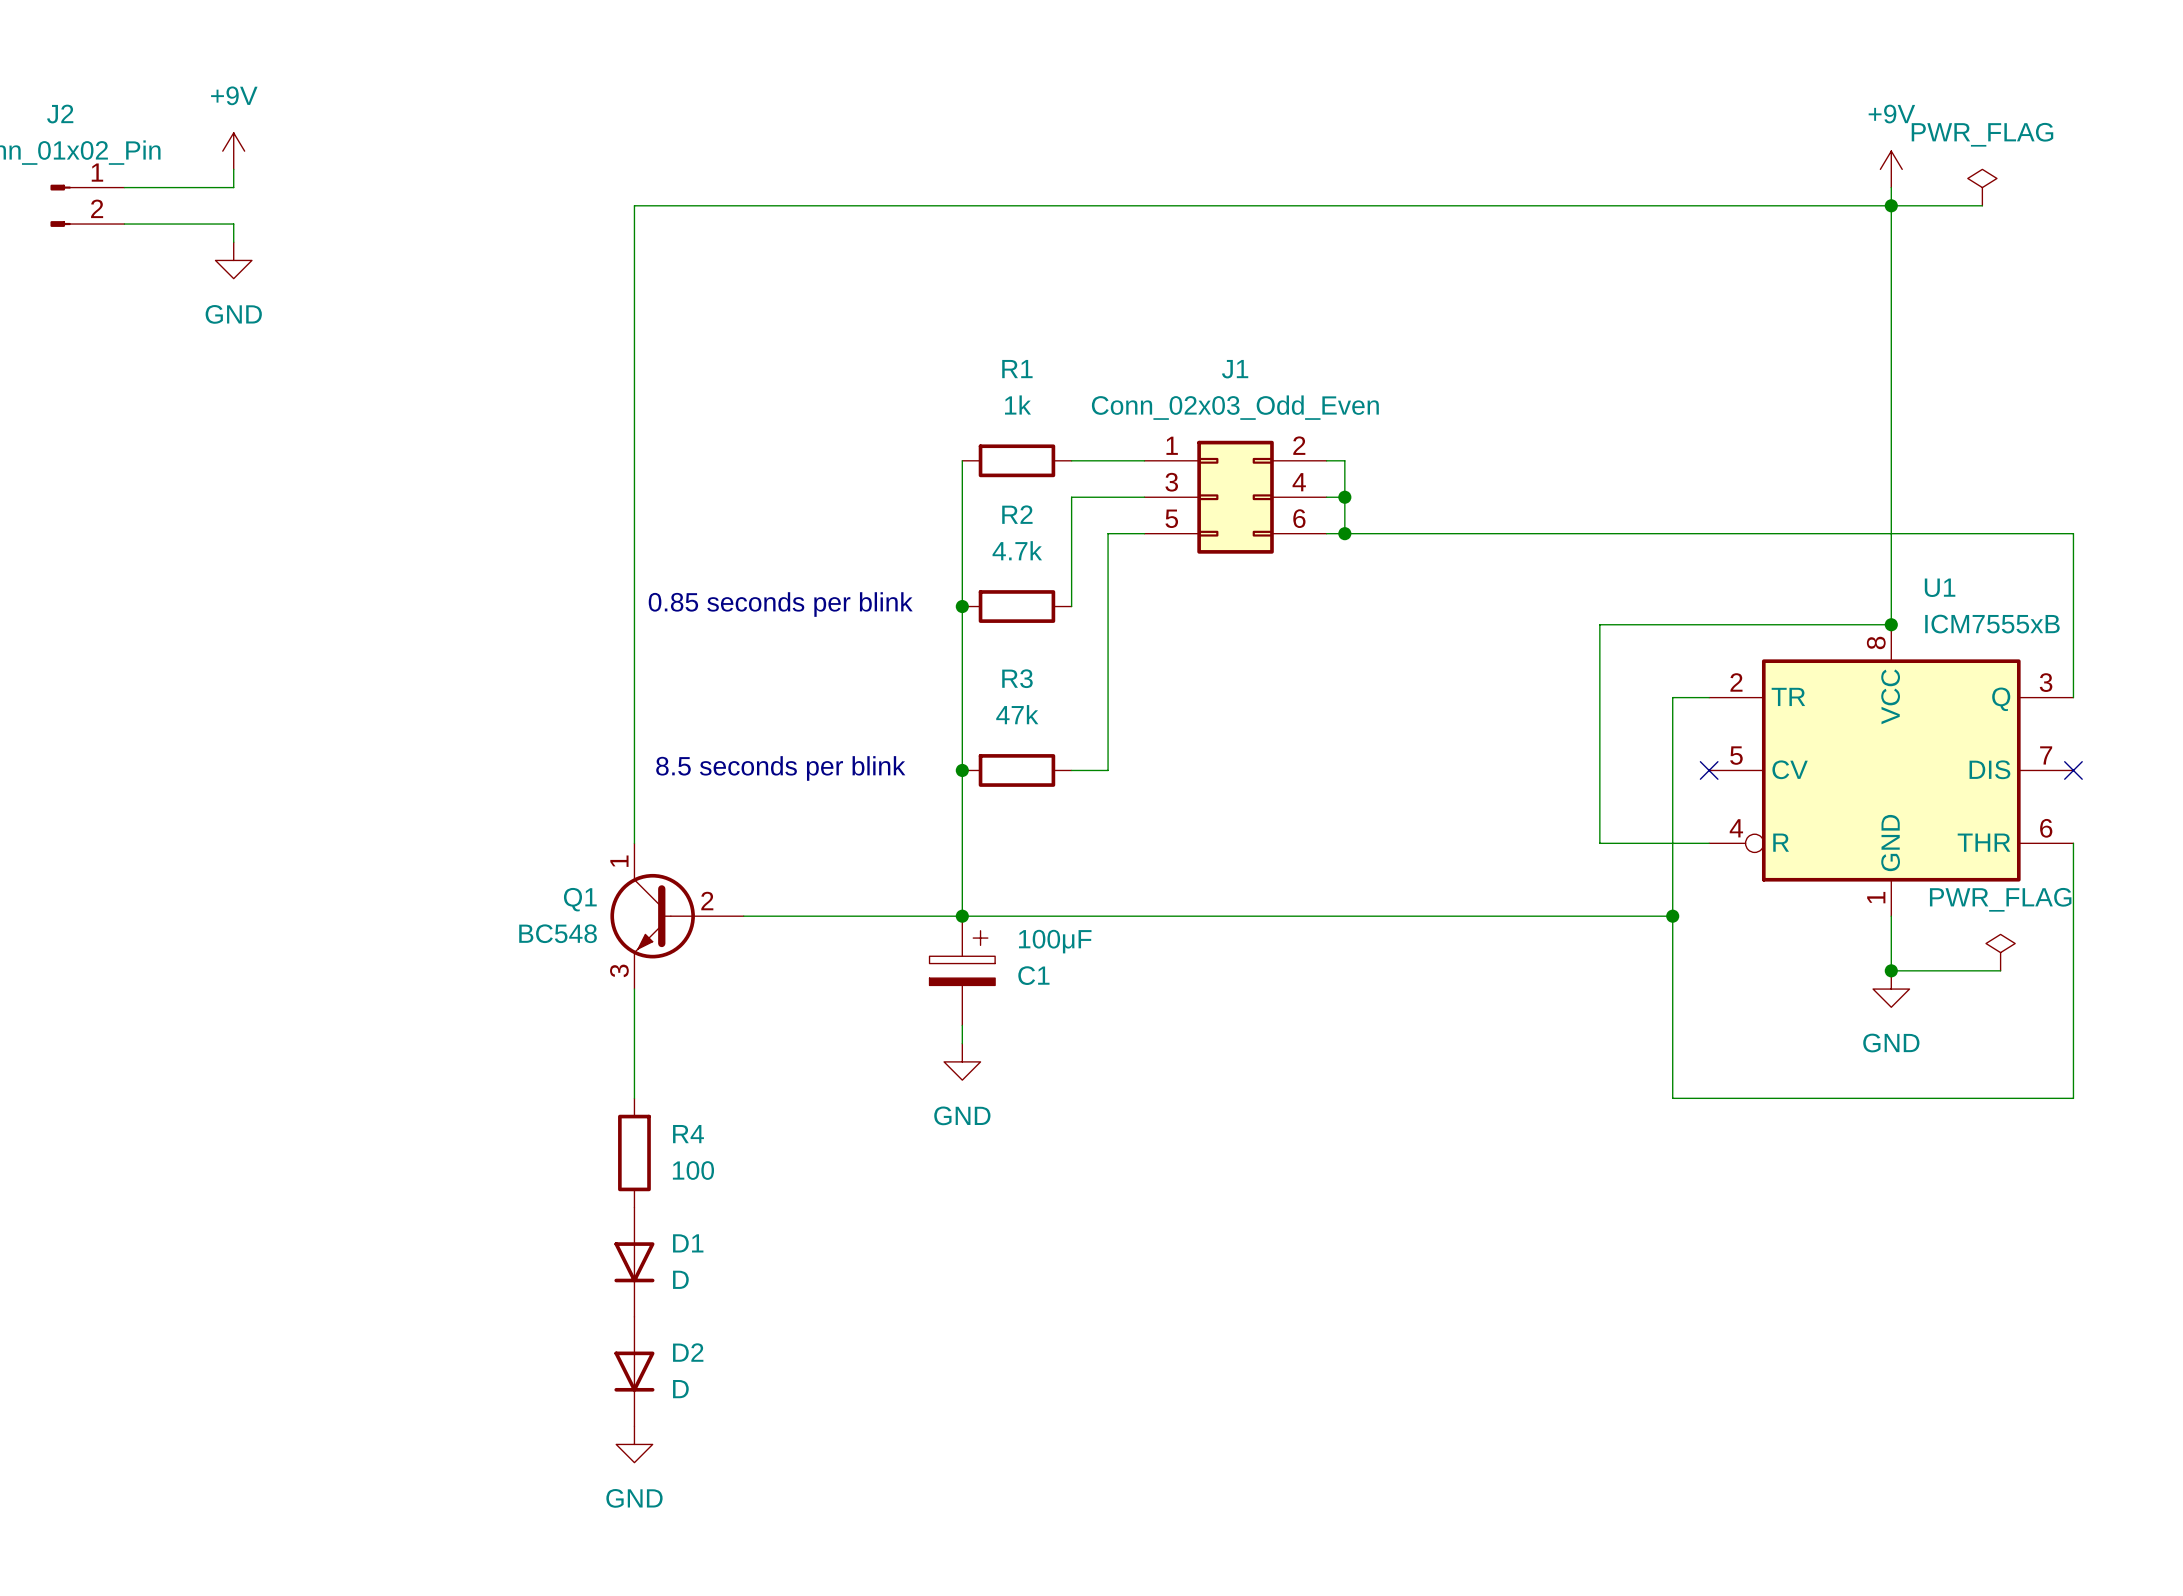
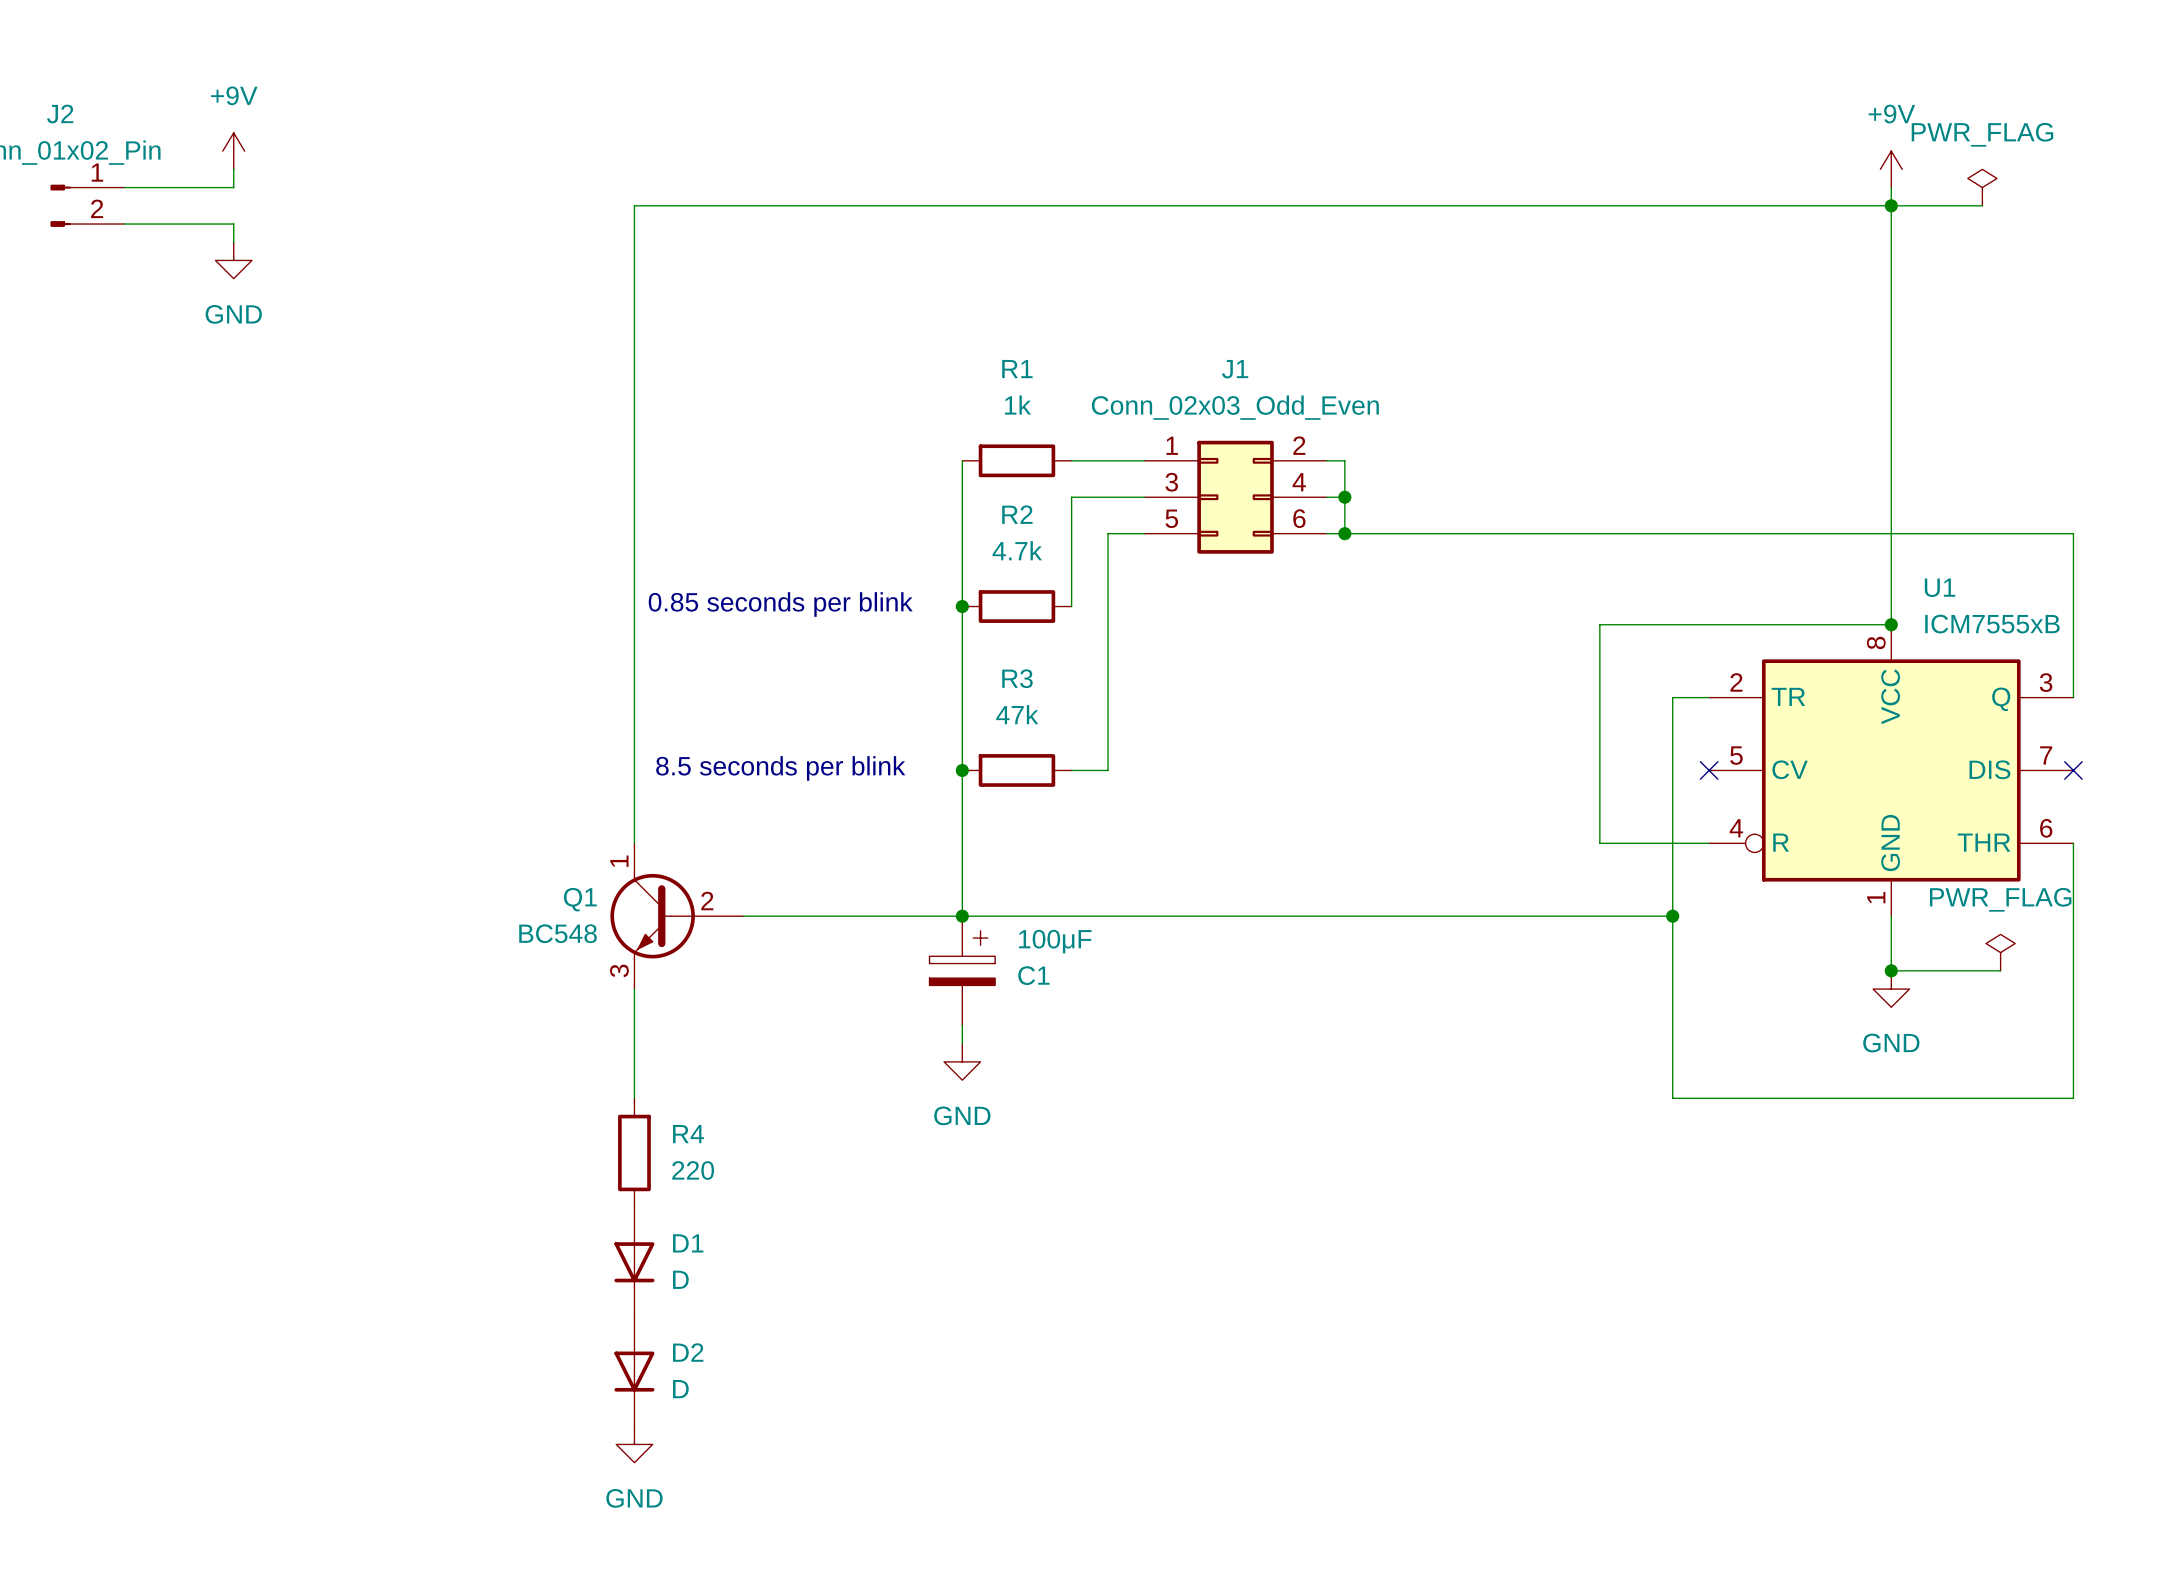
R4 value: 100 (693, 1170) -> 220 (693, 1170)

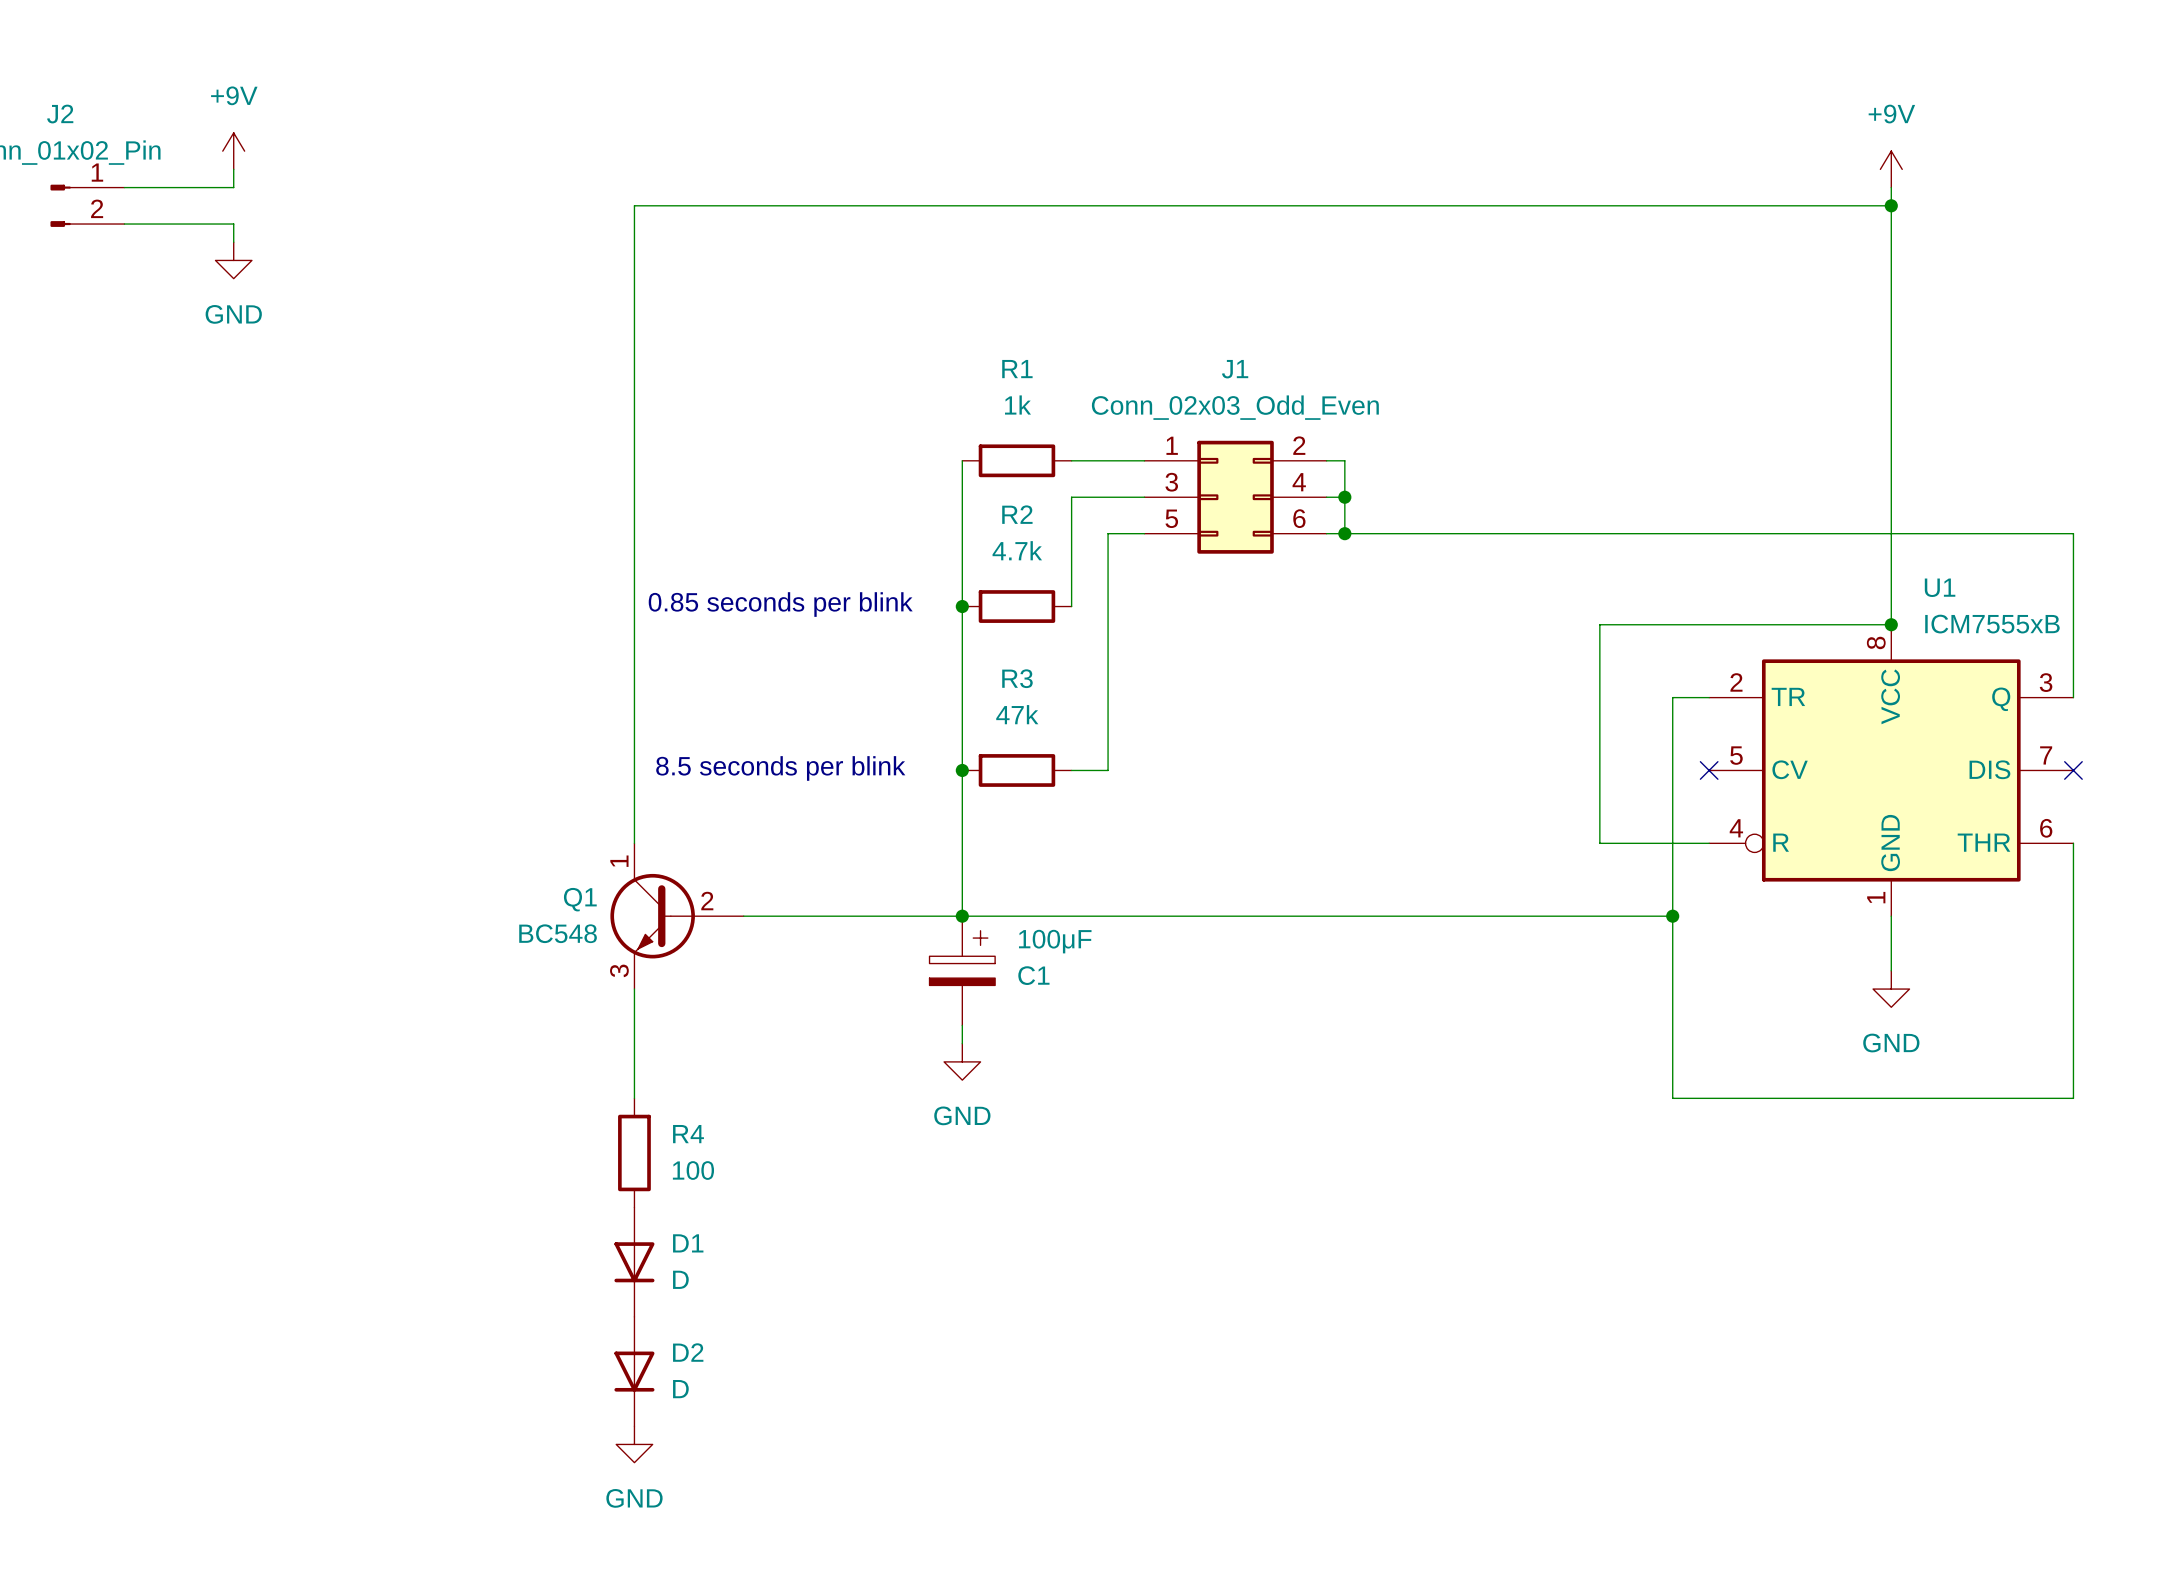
power symbol: PWR_FLAG (1982, 187) -> none
wire: (1891, 205) (1982, 205) -> none
power symbol: PWR_FLAG (2000, 952) -> none
wire: (1891, 970) (2000, 970) -> none
junction: (1891, 970) -> none
R4 value: 220 (693, 1170) -> 100 (693, 1170)

